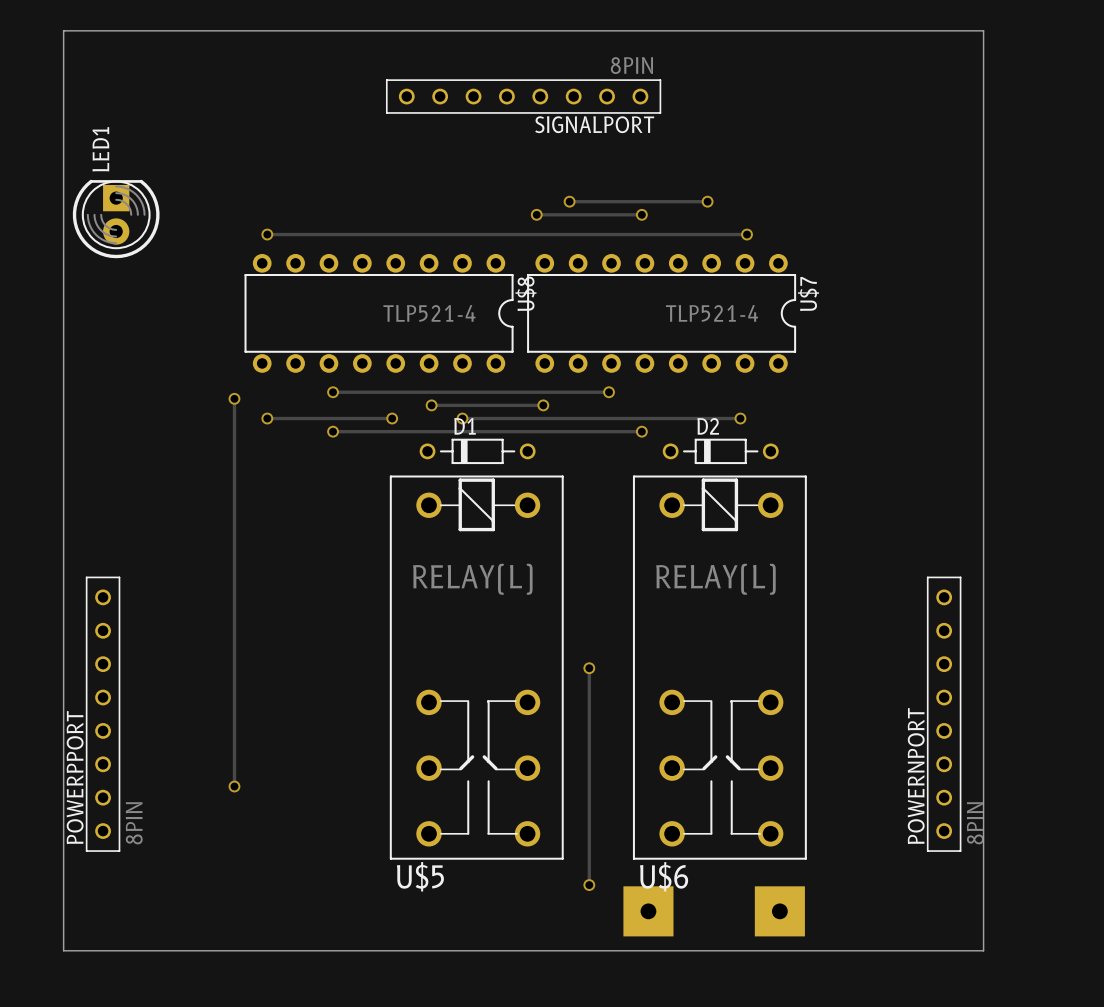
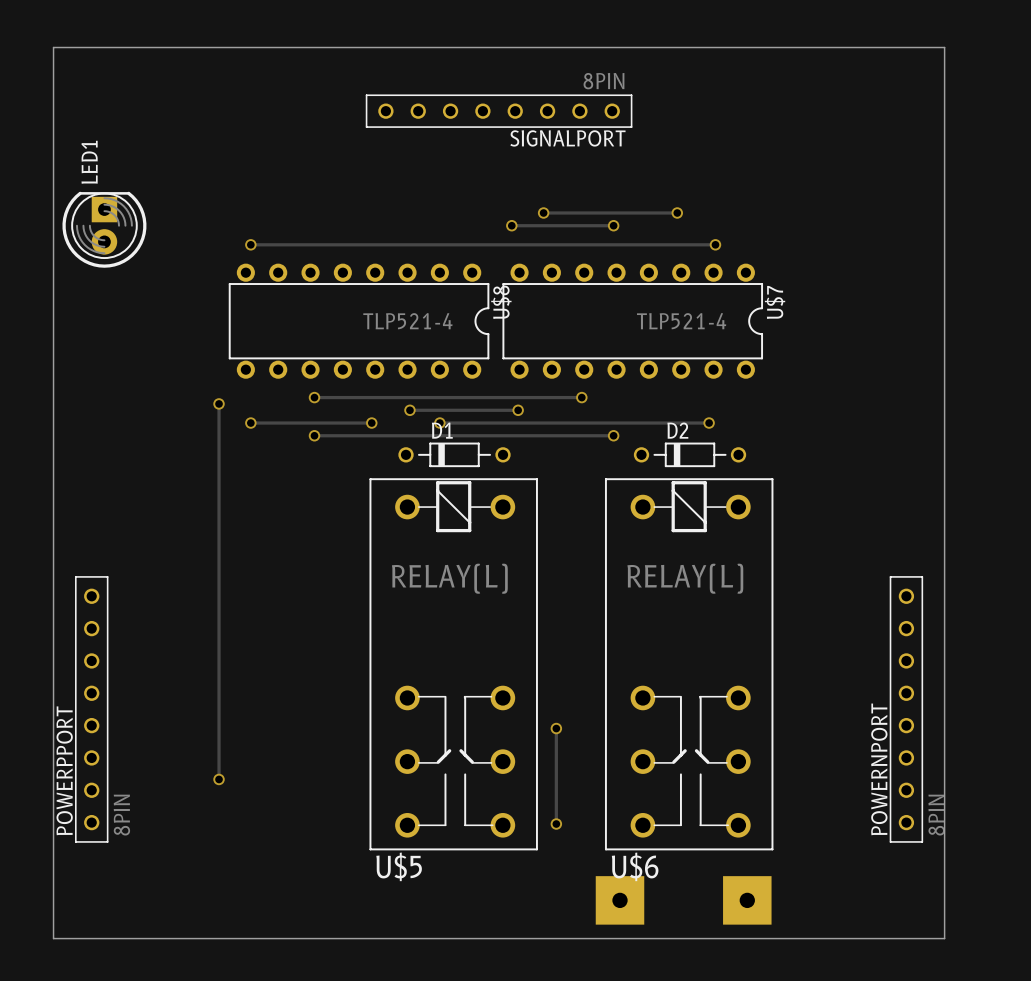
track: (589, 668) (589, 885) -> none
via position: (589, 668) -> (556, 728)
track: none -> (556, 728) (556, 824)
via position: (589, 885) -> (556, 824)

